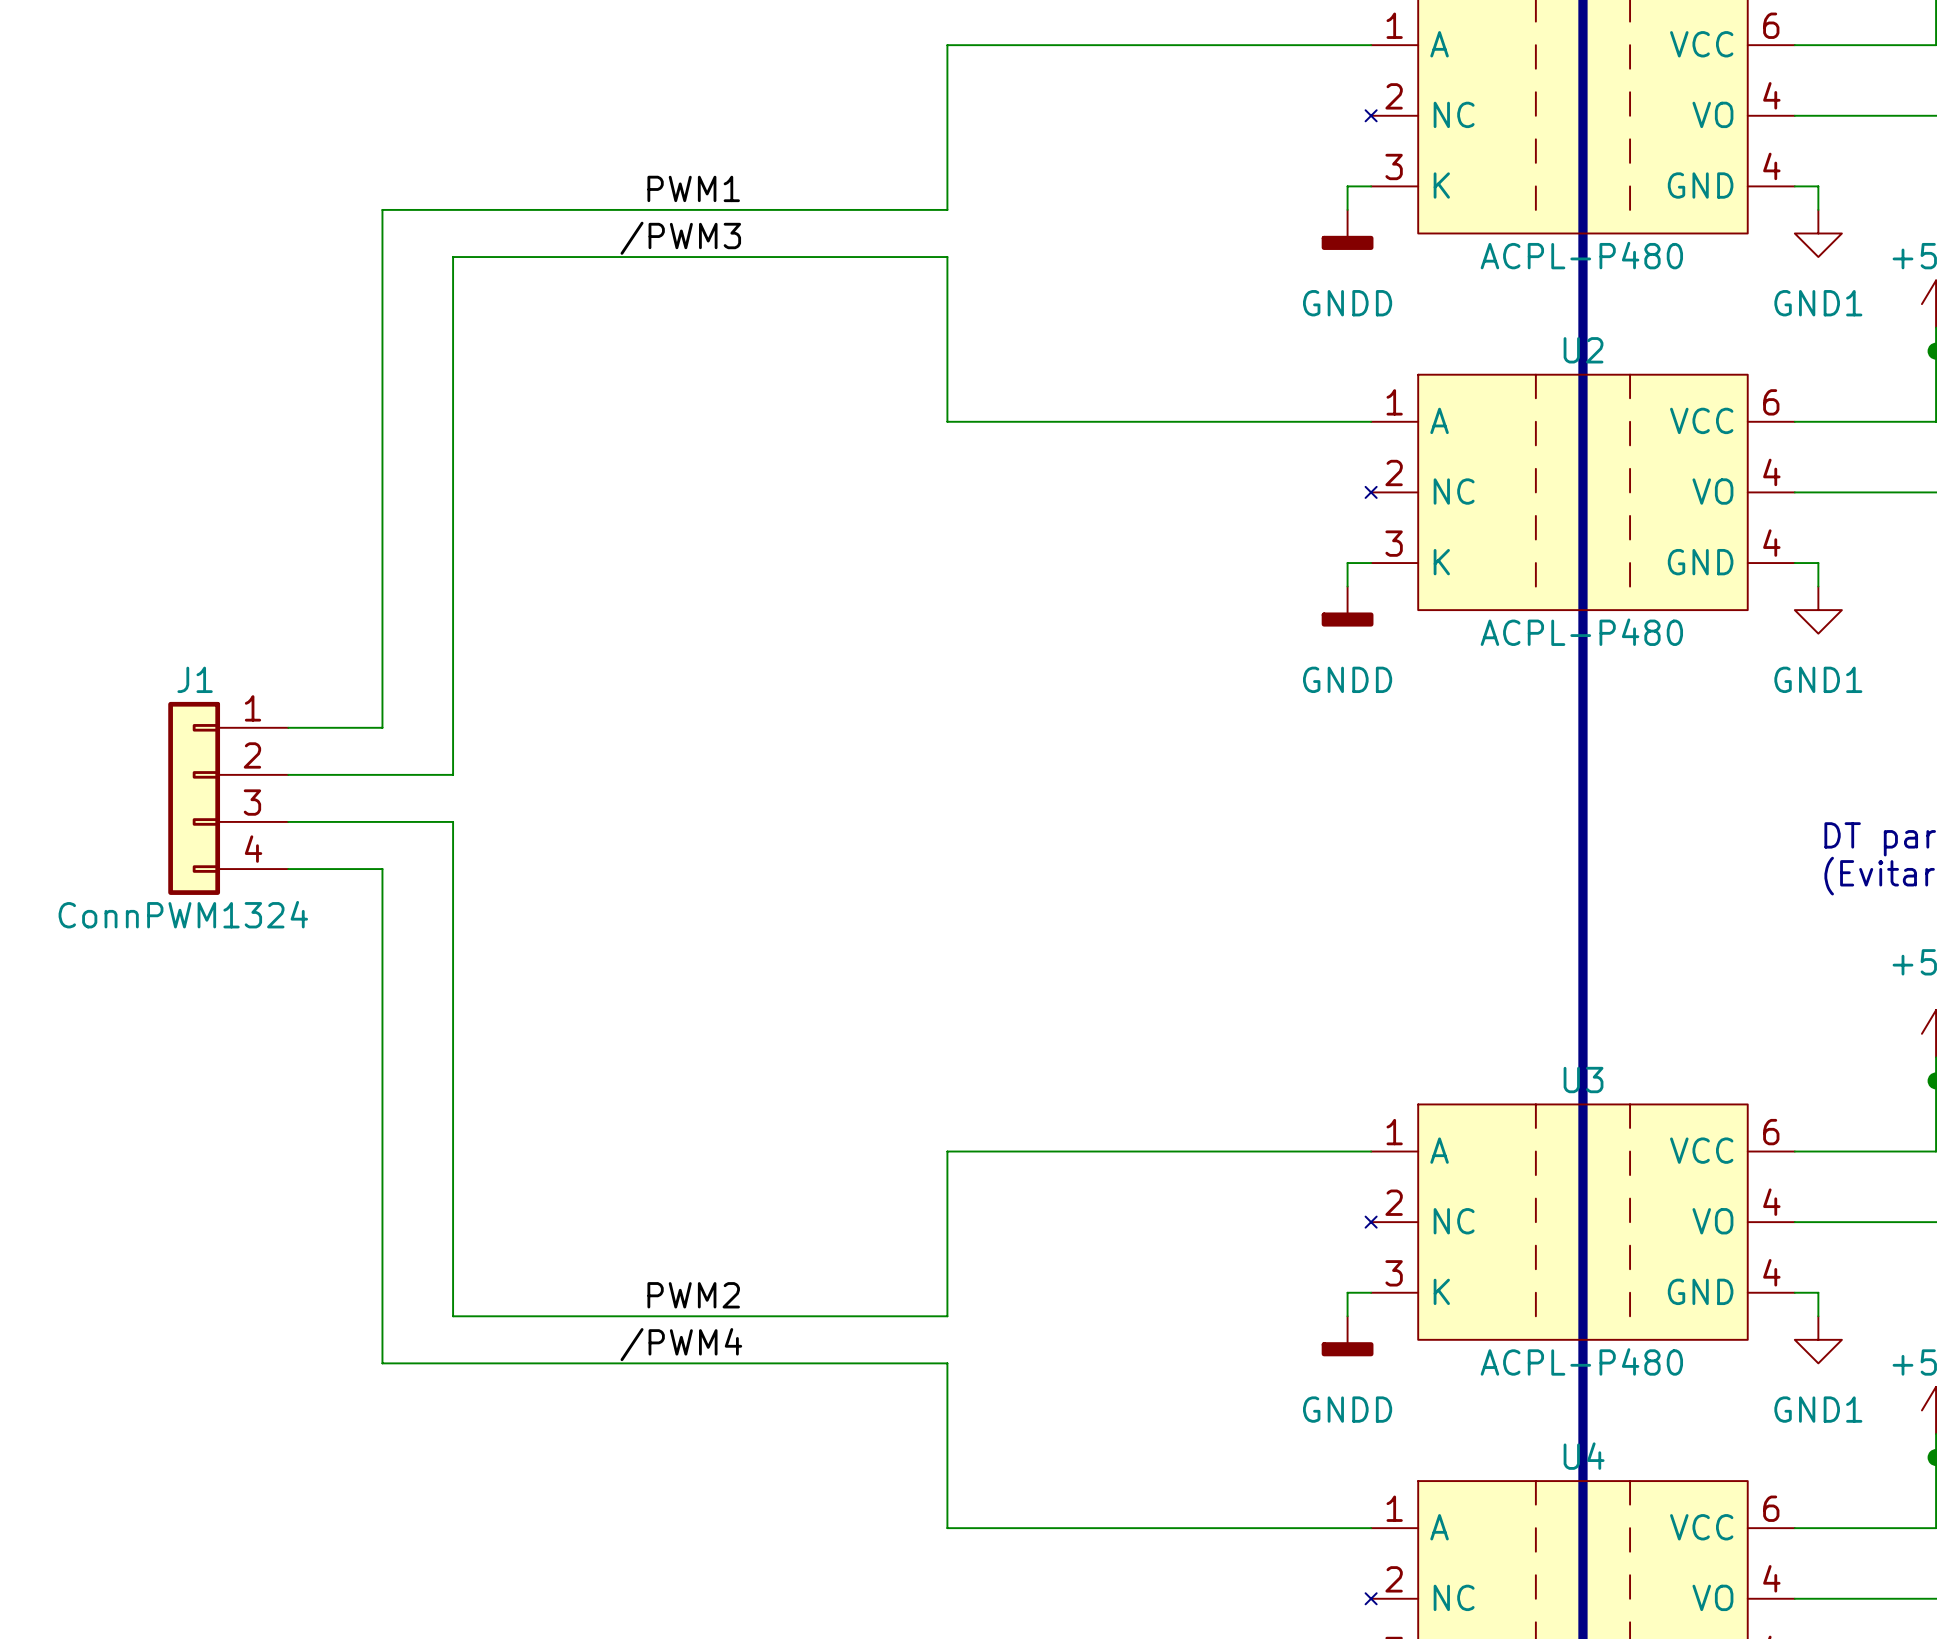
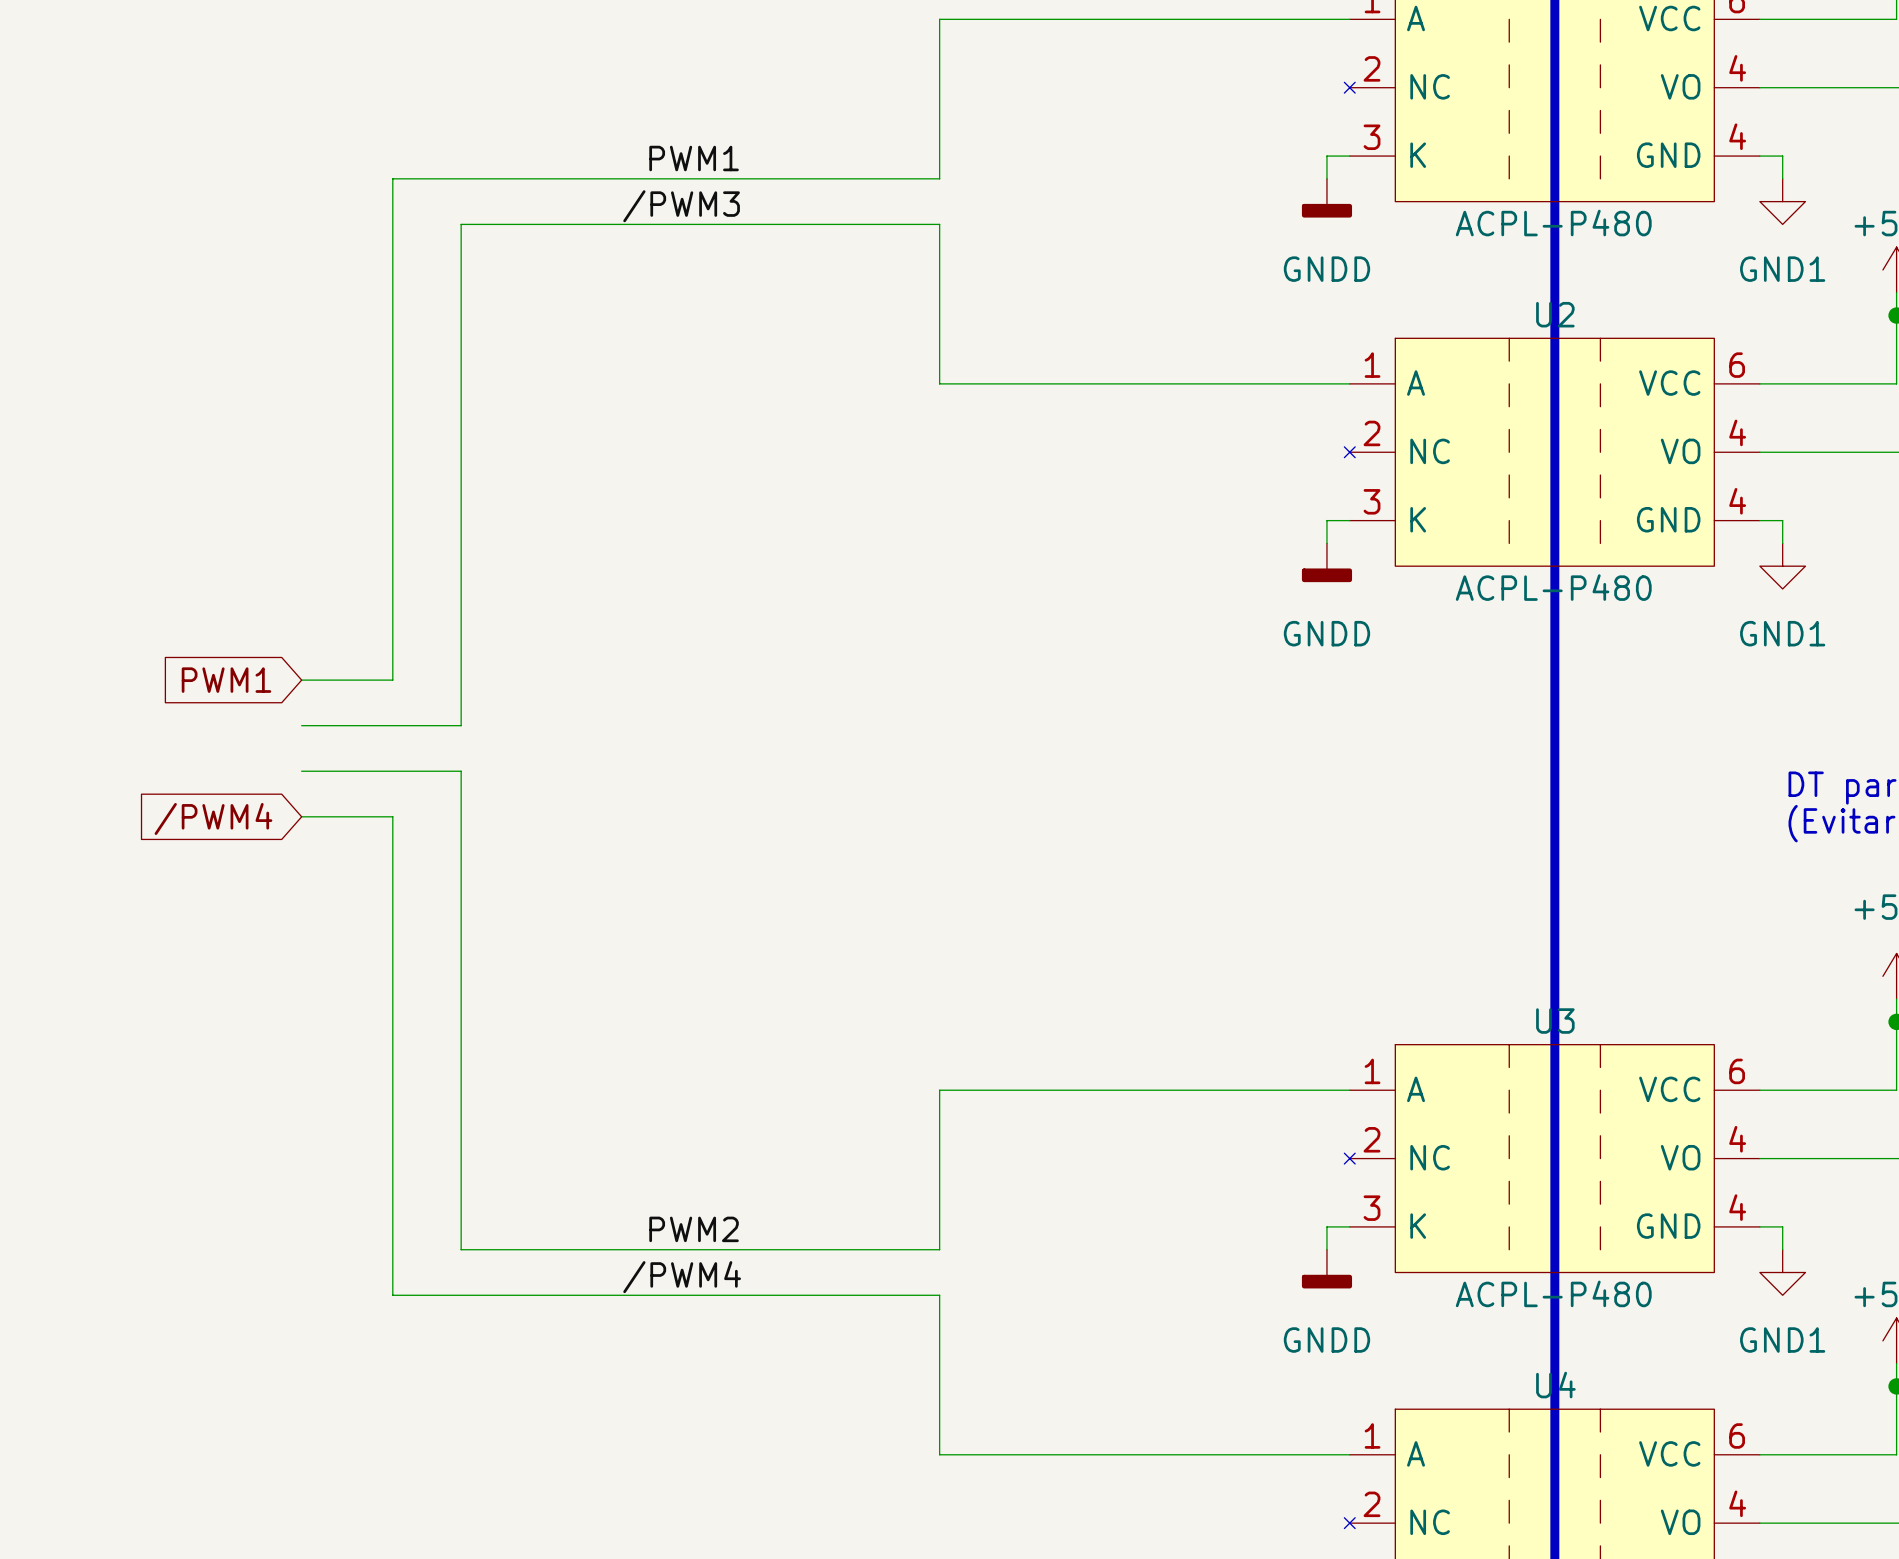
global label: none -> PWM1 (226, 680)
J1: ConnPWM1324 (228, 798) -> none
global label: none -> /PWM4 (213, 818)

